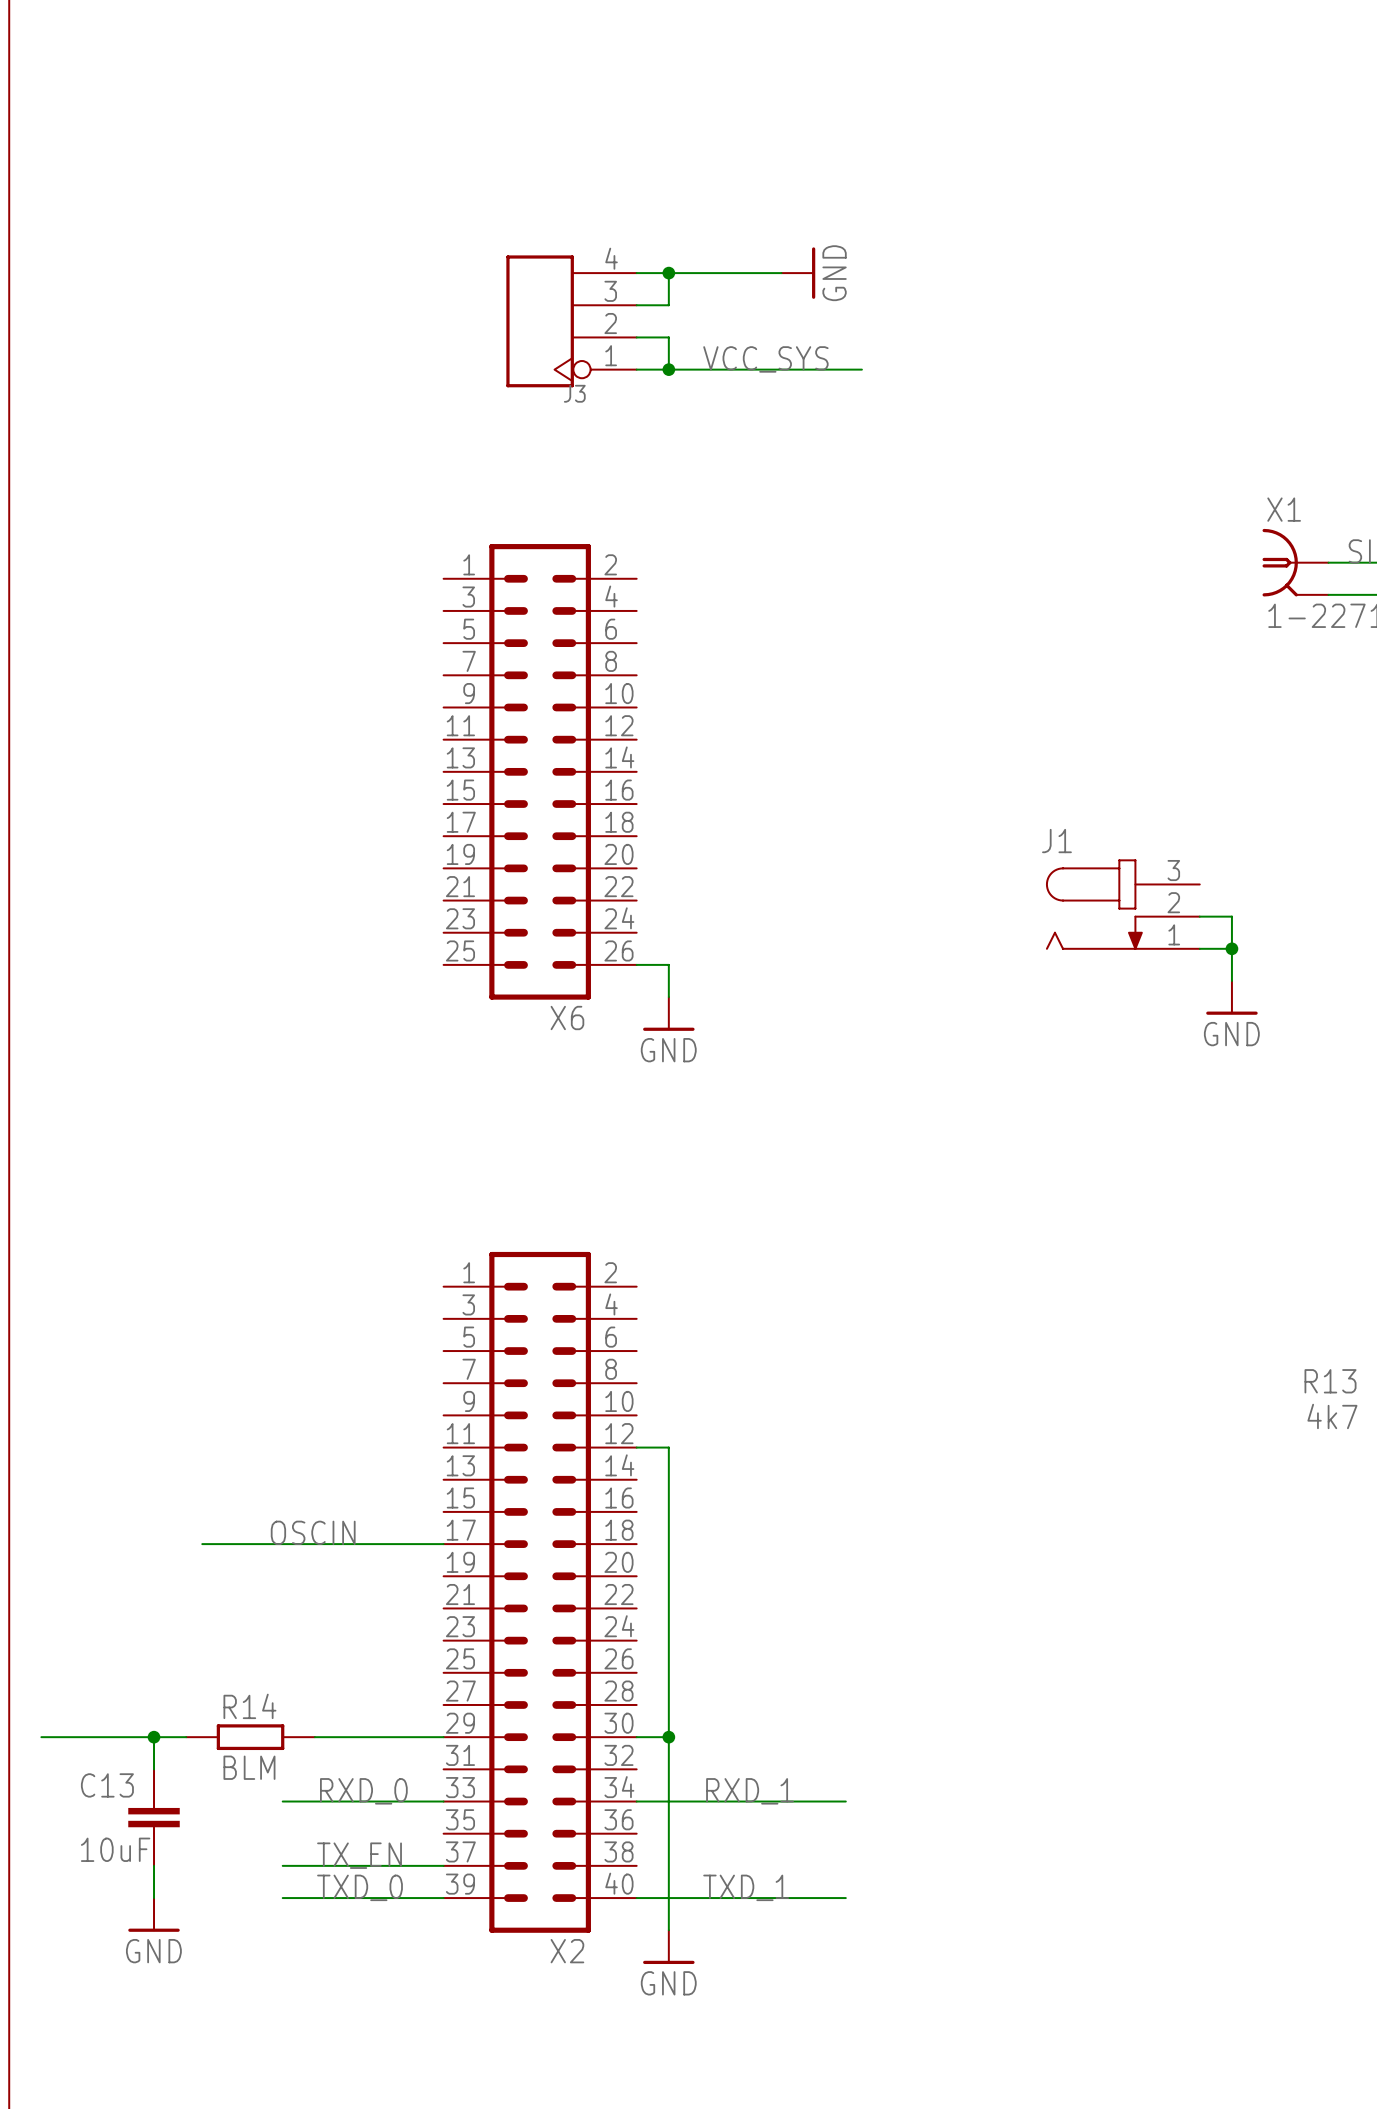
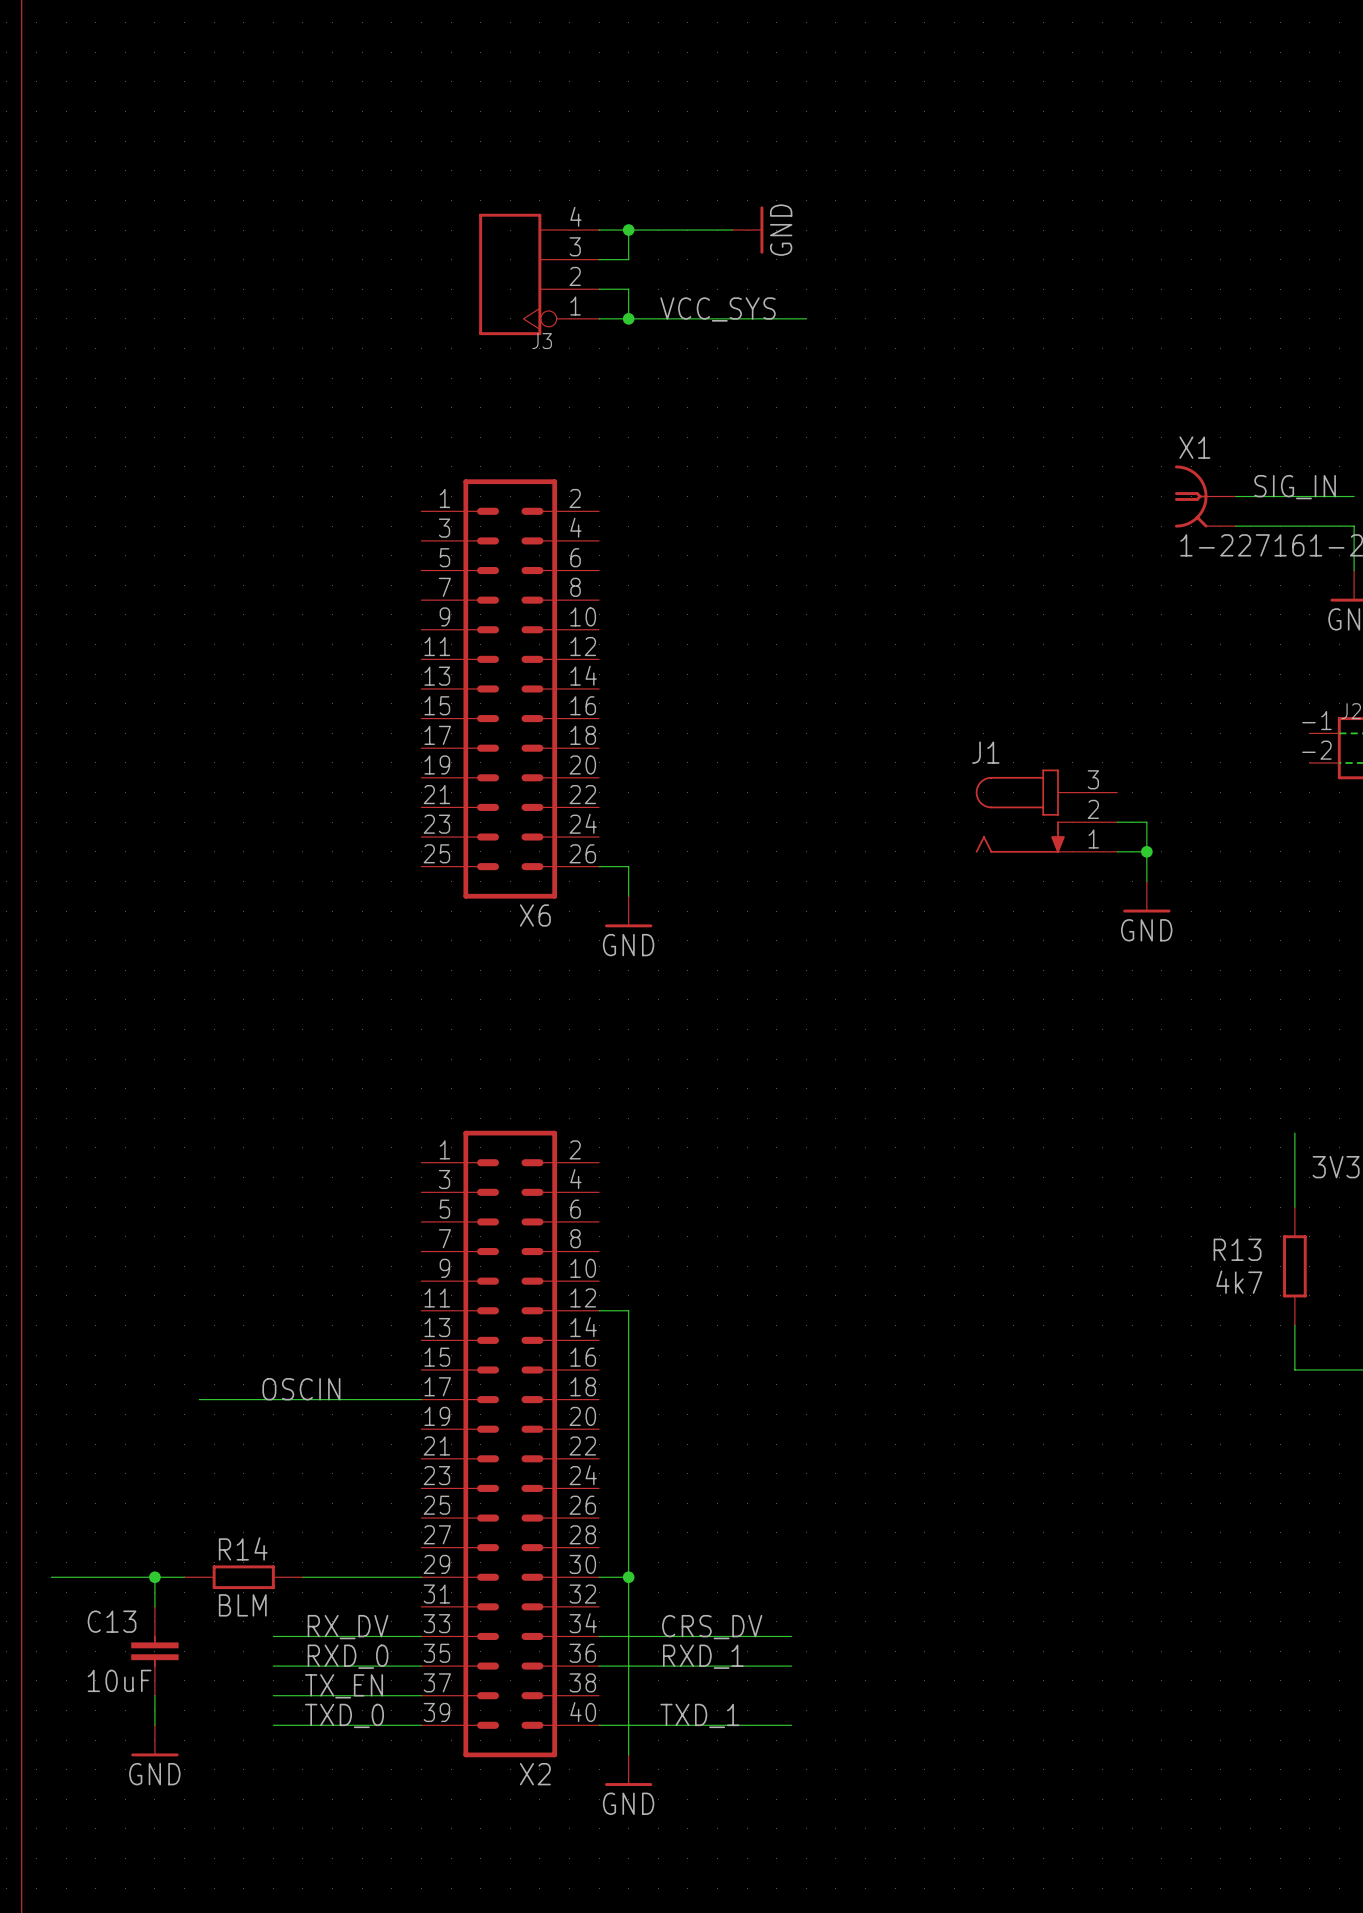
label: RXD_0 (363, 1791) -> RX_DV (348, 1627)
label: RXD_1 (749, 1791) -> CRS_DV (712, 1627)
label: none -> RXD_0 (348, 1656)
label: none -> RXD_1 (703, 1656)
wire: none -> (273, 1666) (421, 1666)
wire: none -> (599, 1666) (791, 1666)

